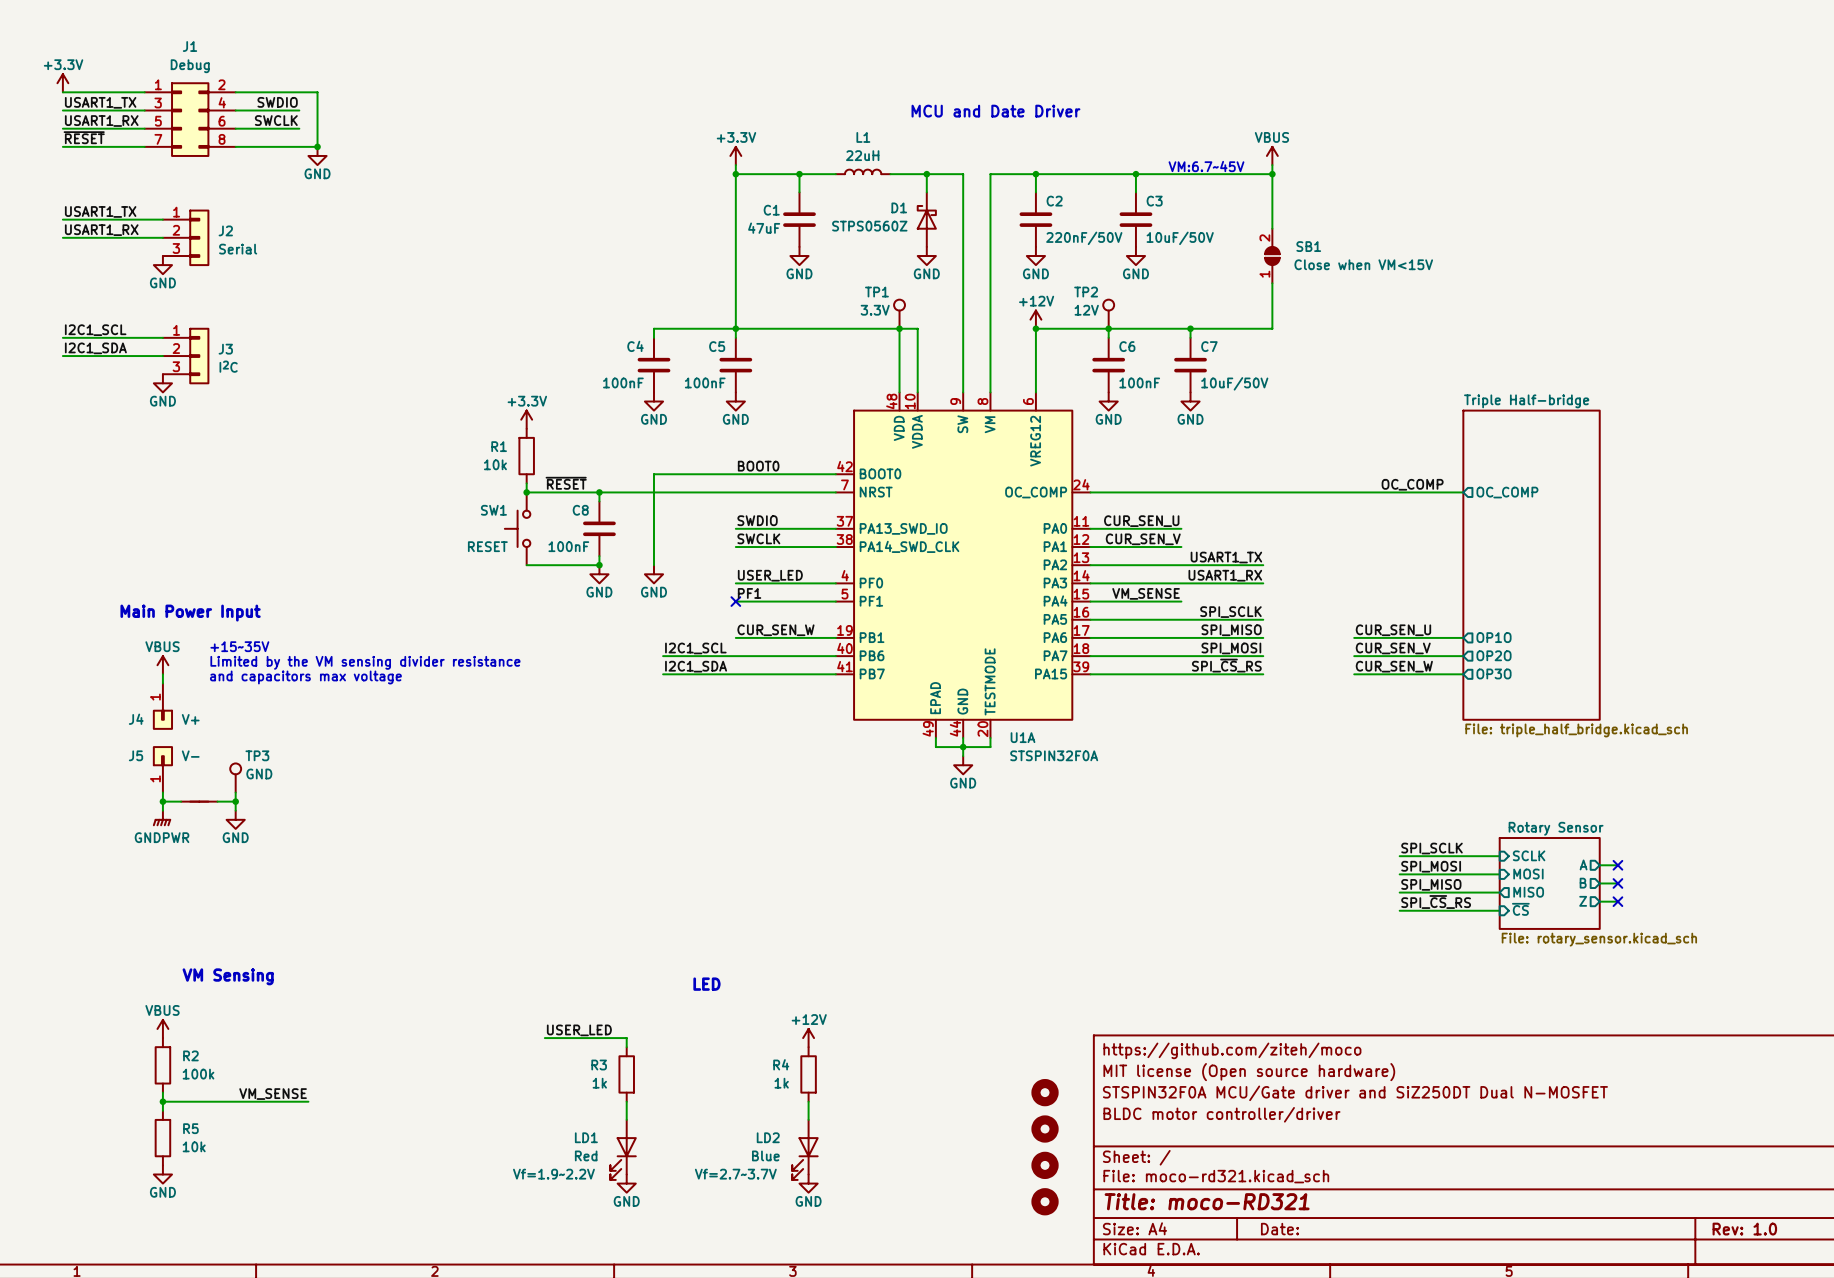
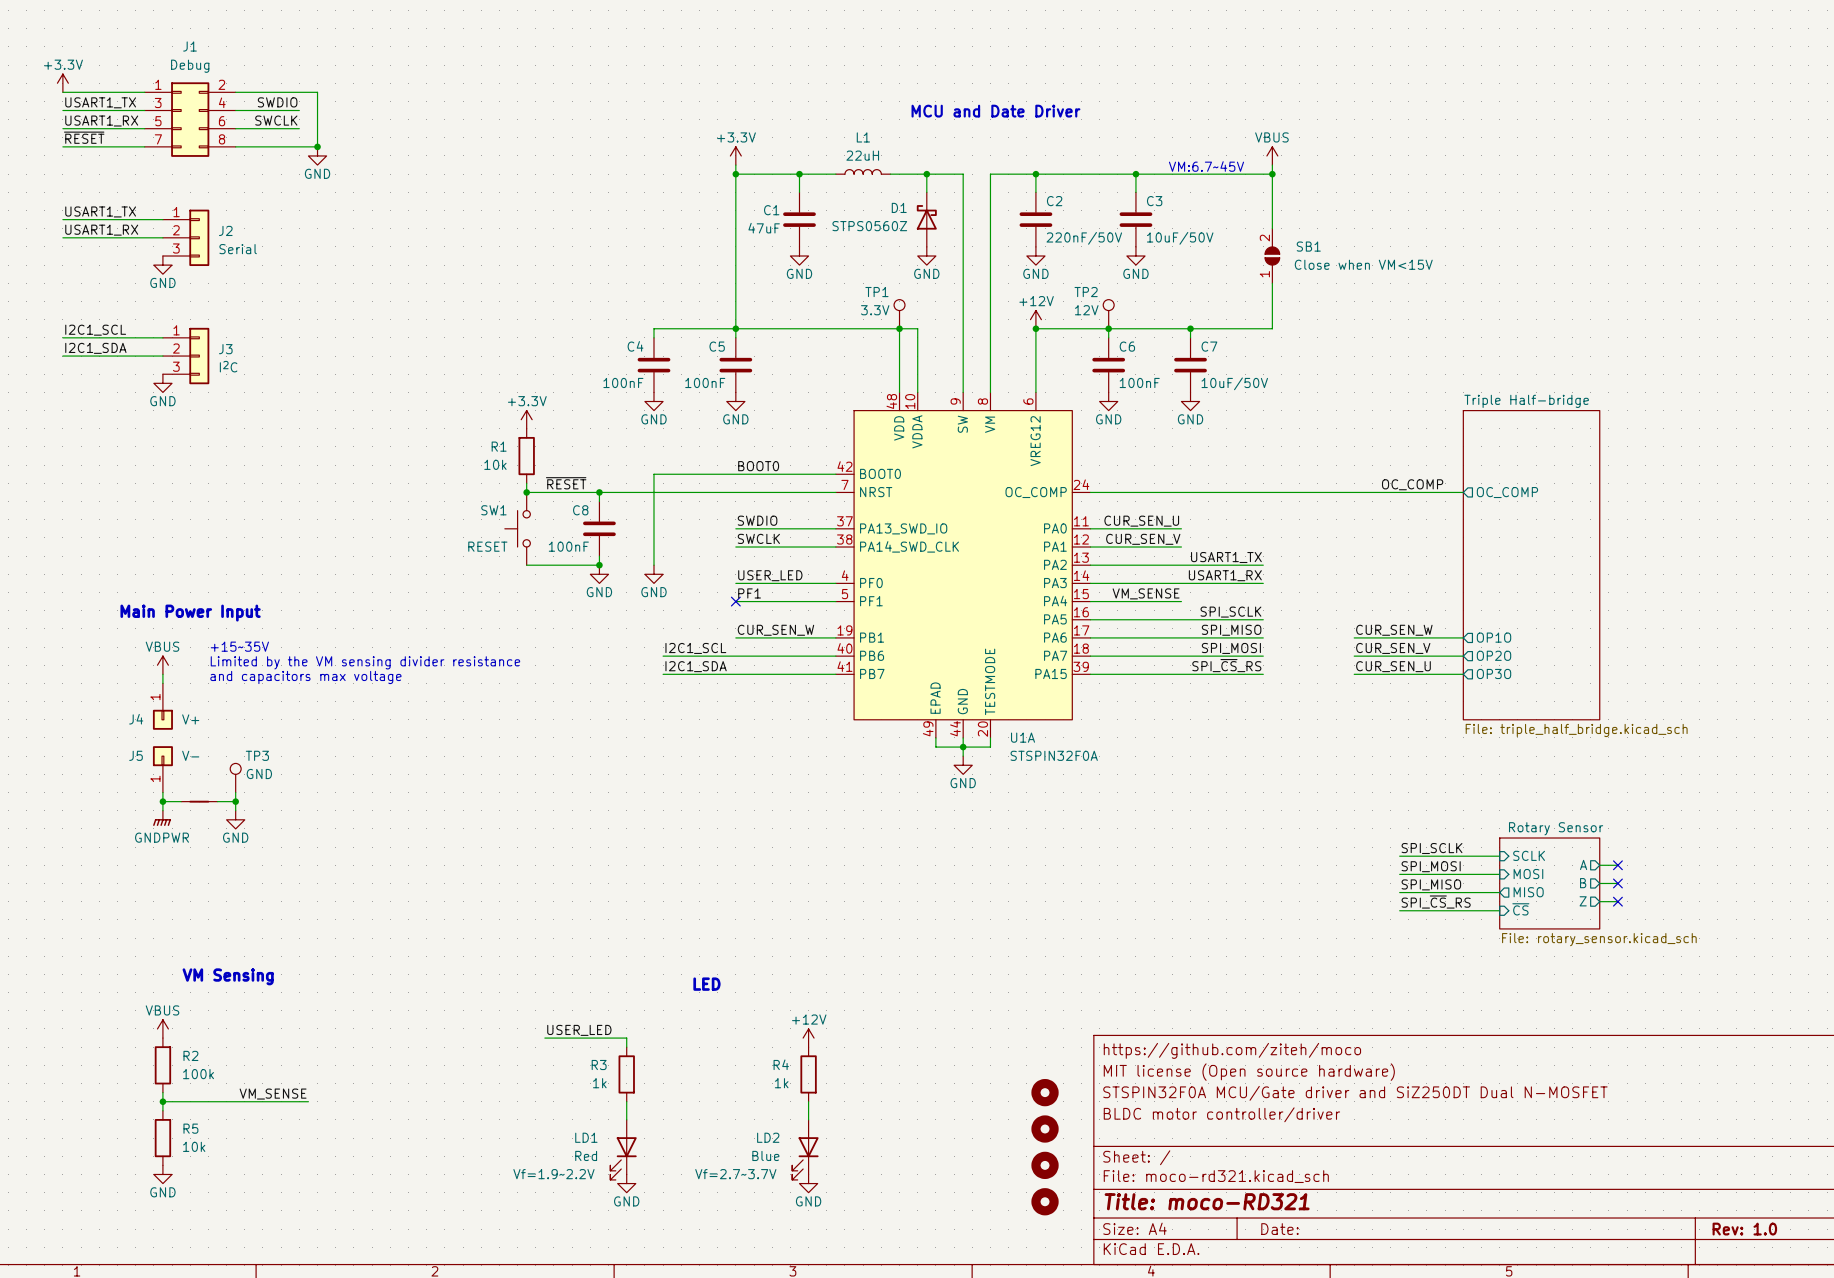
label: CUR_SEN_U (1393, 630) -> CUR_SEN_W (1394, 630)
label: CUR_SEN_W (1394, 666) -> CUR_SEN_U (1393, 666)

